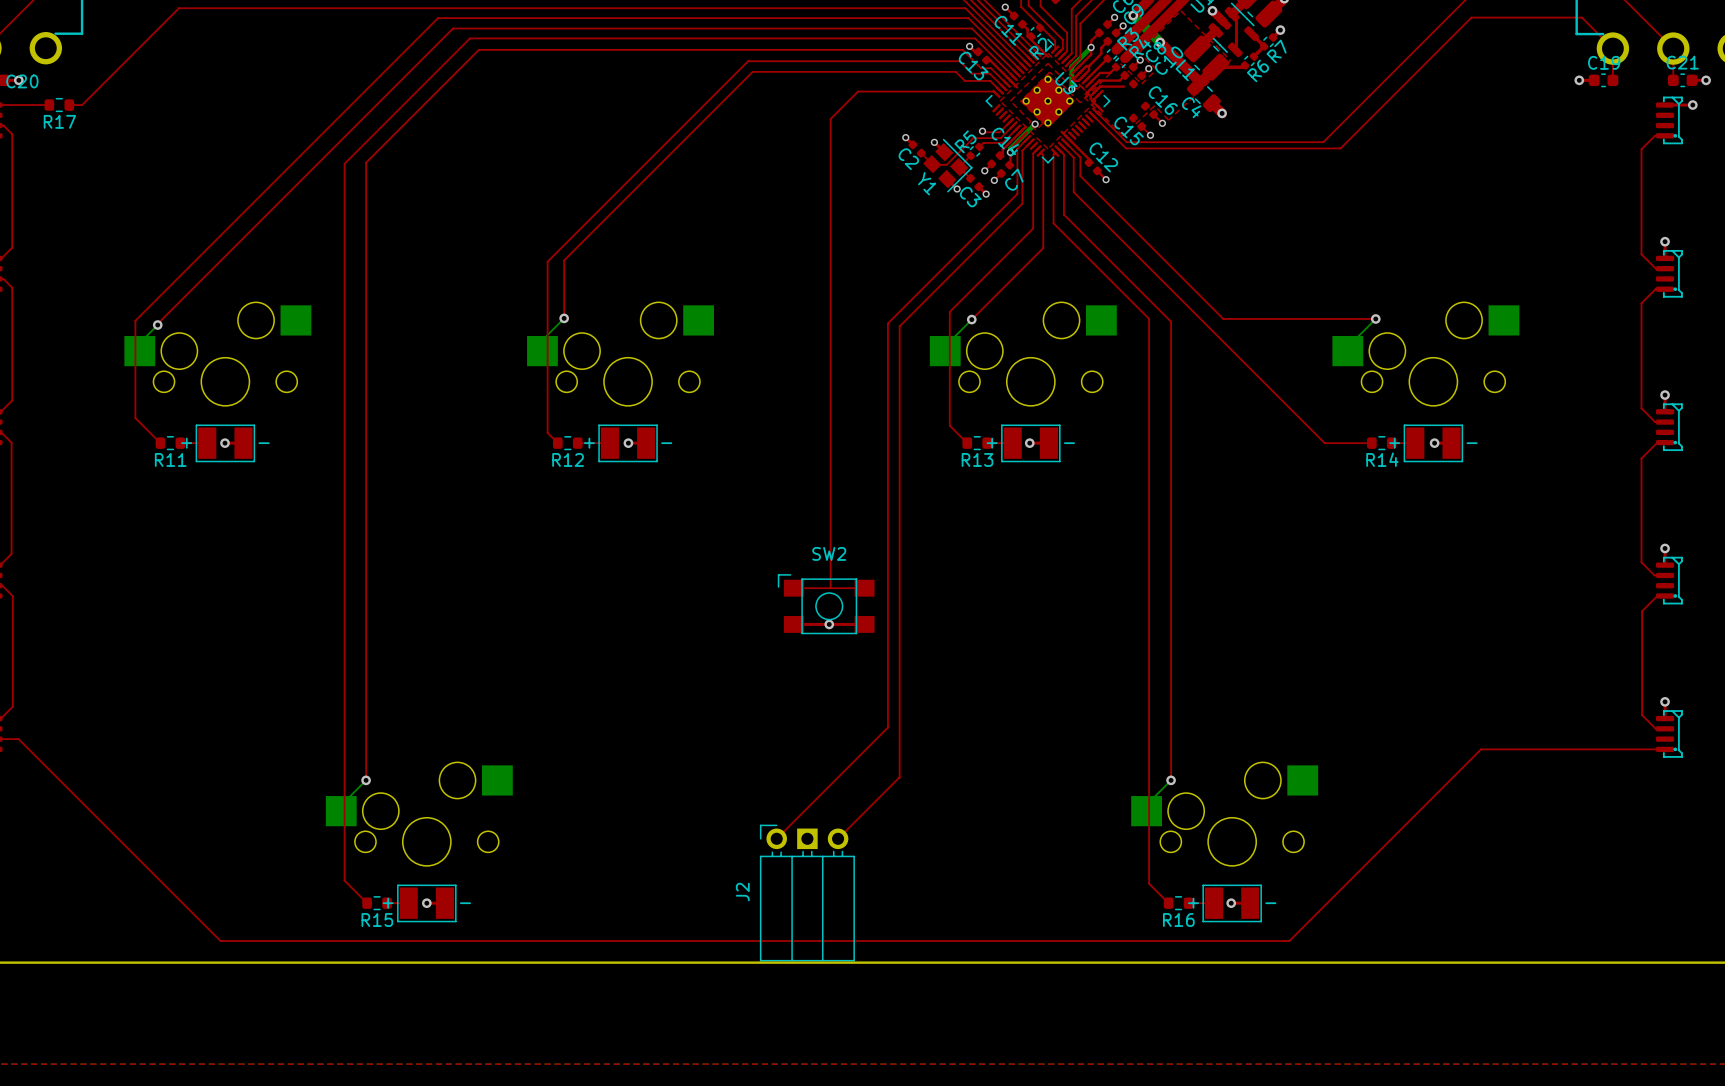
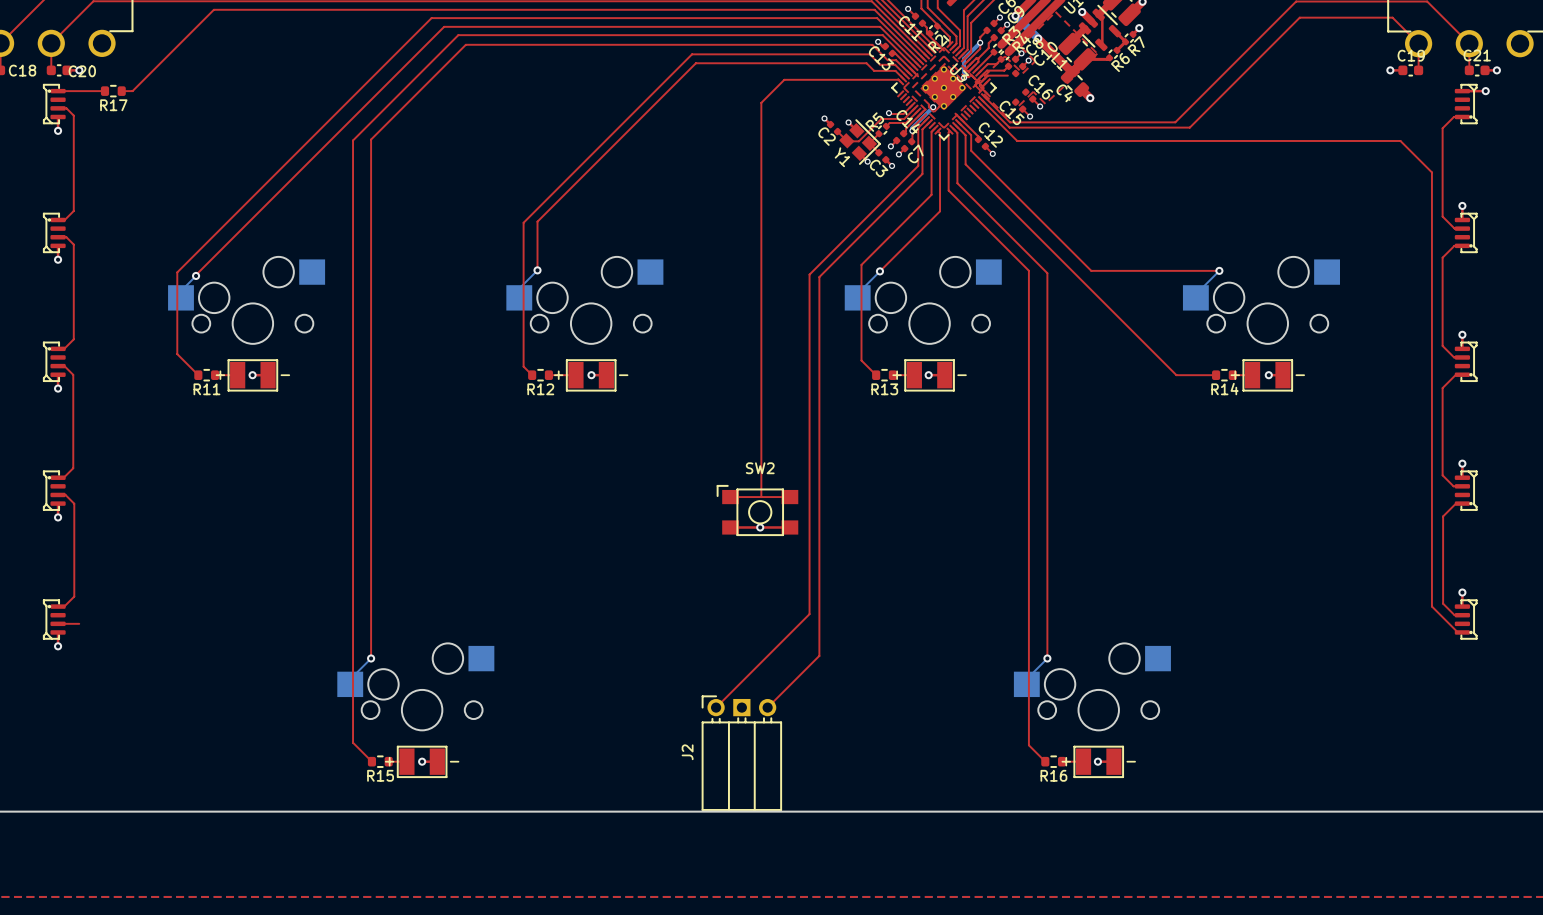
top track: (18, 739) (220, 940) (1289, 940) (1481, 749) (1659, 749) -> (978, 102) (1017, 140) (1400, 140) (1431, 172) (1431, 606) (1457, 632)

